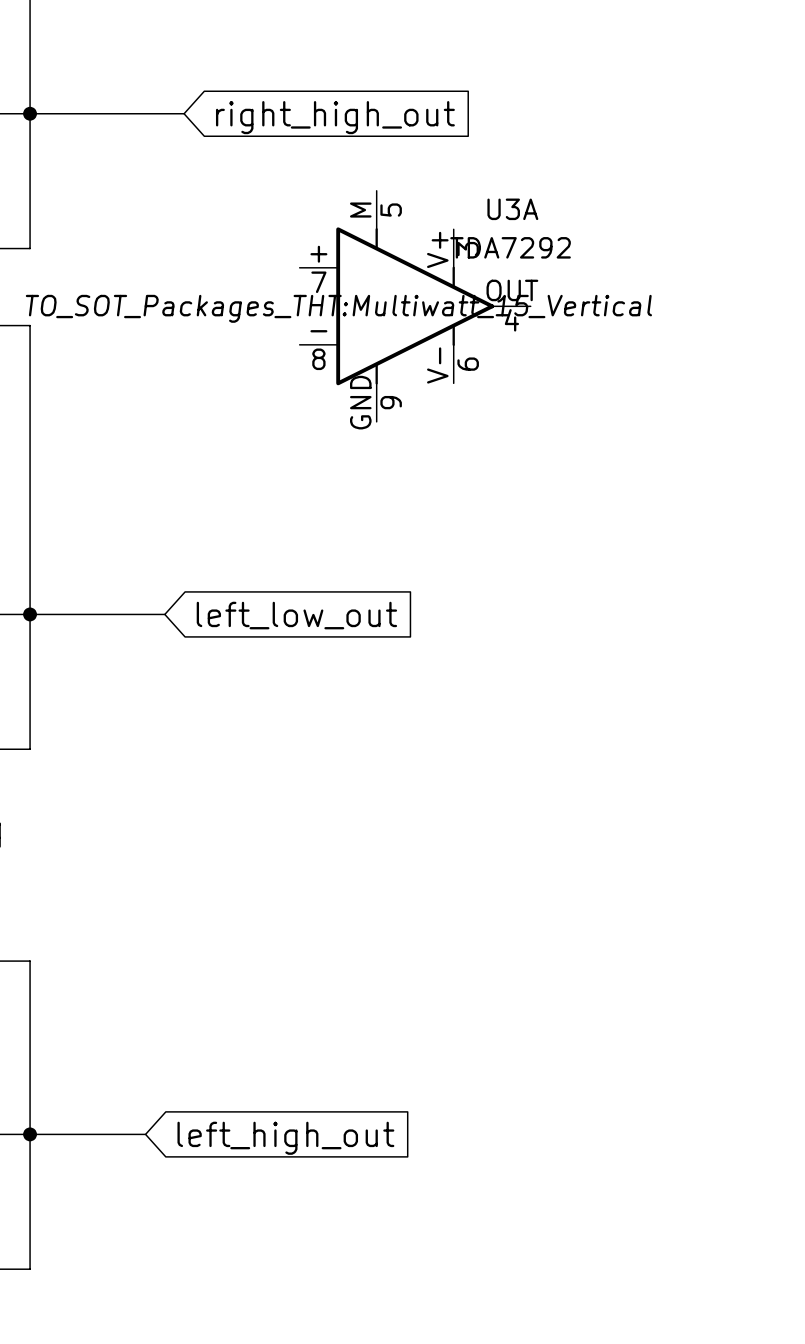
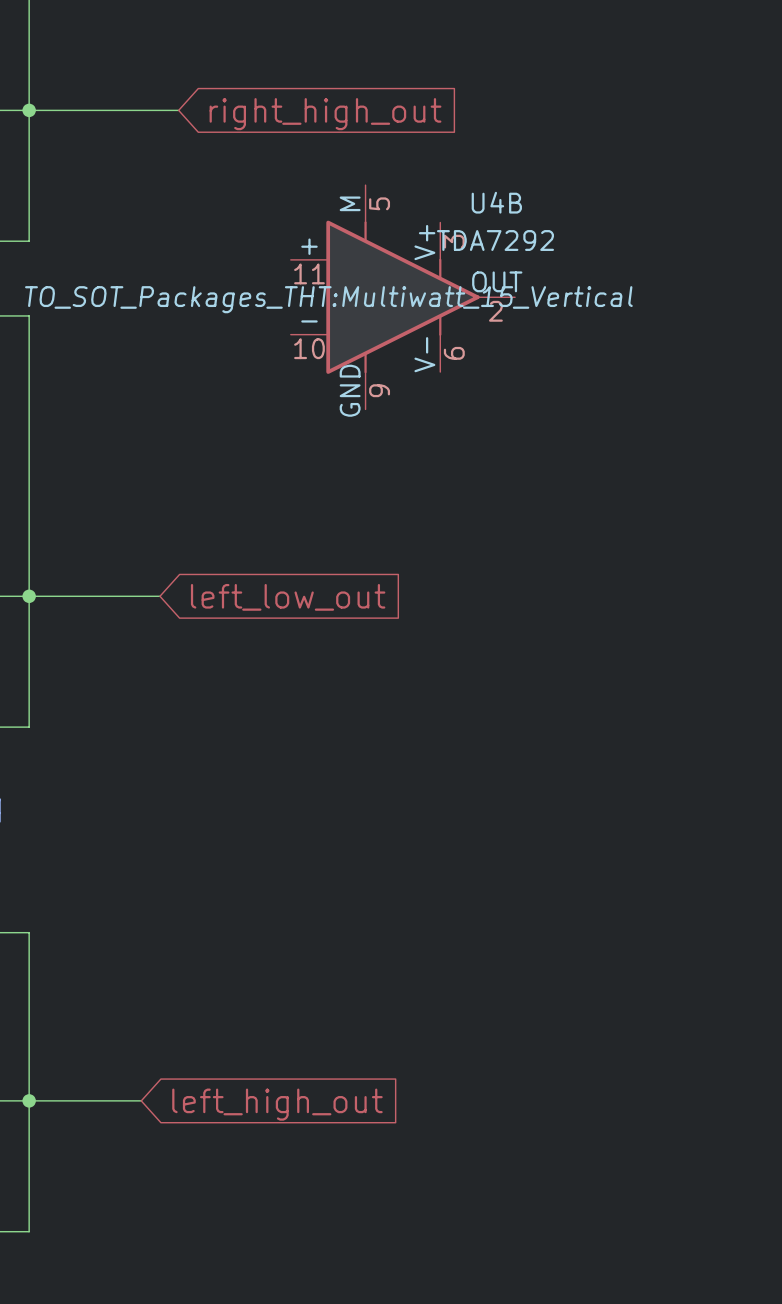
U3A name: U3A (512, 209) -> U4B (496, 202)
U3A pin number: 7 (318, 282) -> 11 (309, 273)
U3A pin number: 4 (511, 320) -> 2 (495, 311)
U3A pin number: 8 (318, 359) -> 10 (309, 348)

